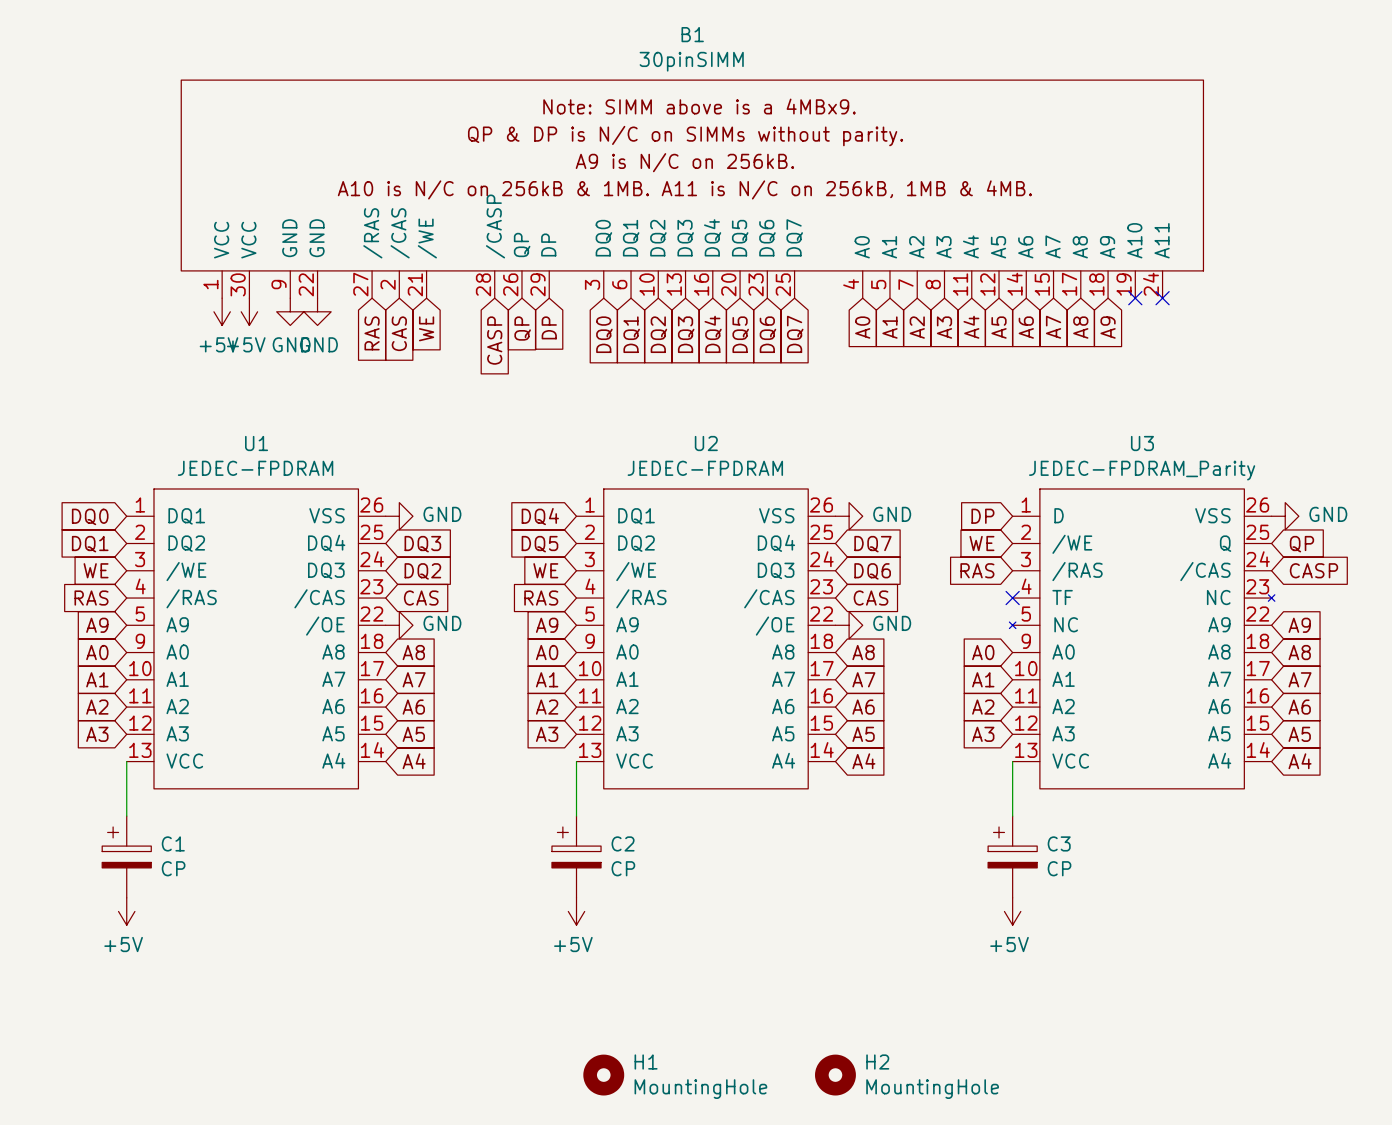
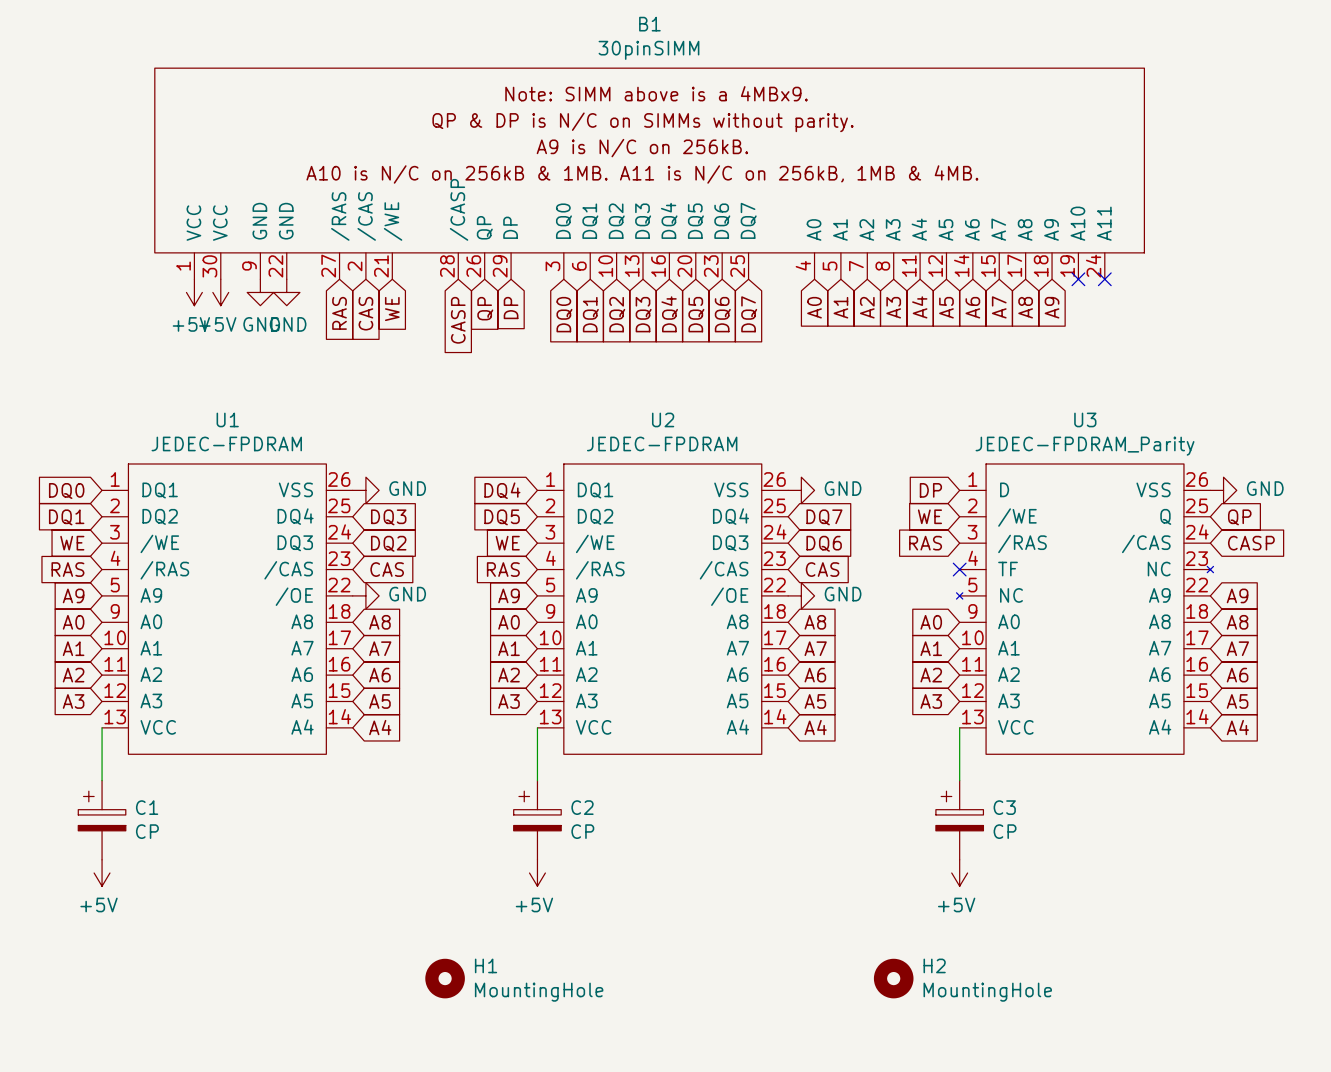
H1 position: (603, 1075) -> (445, 978)
H2 position: (835, 1075) -> (893, 978)

